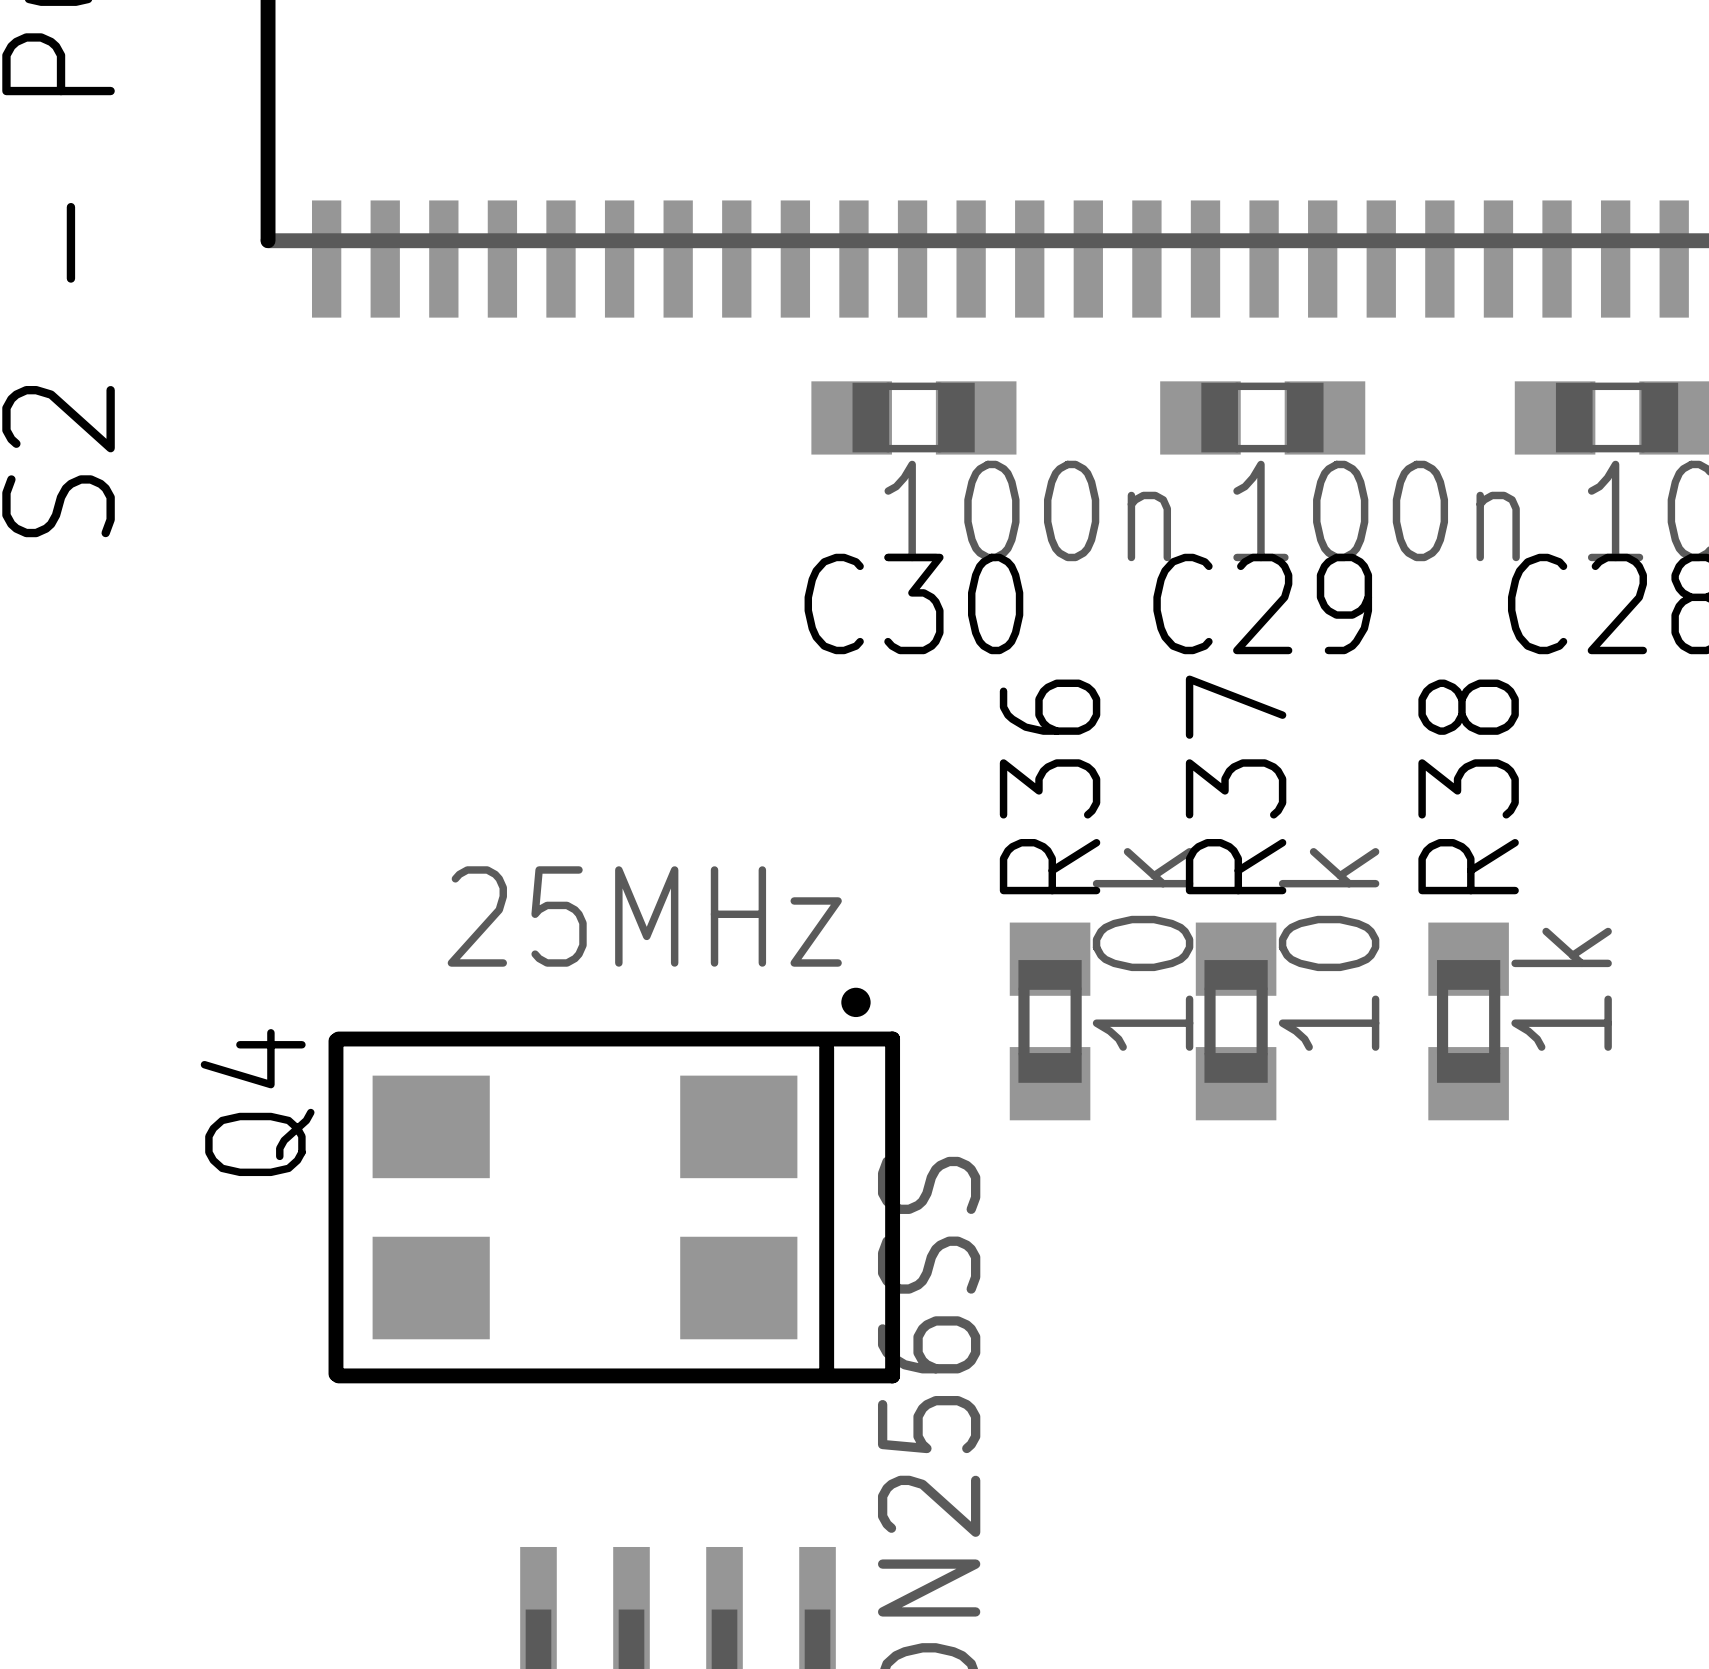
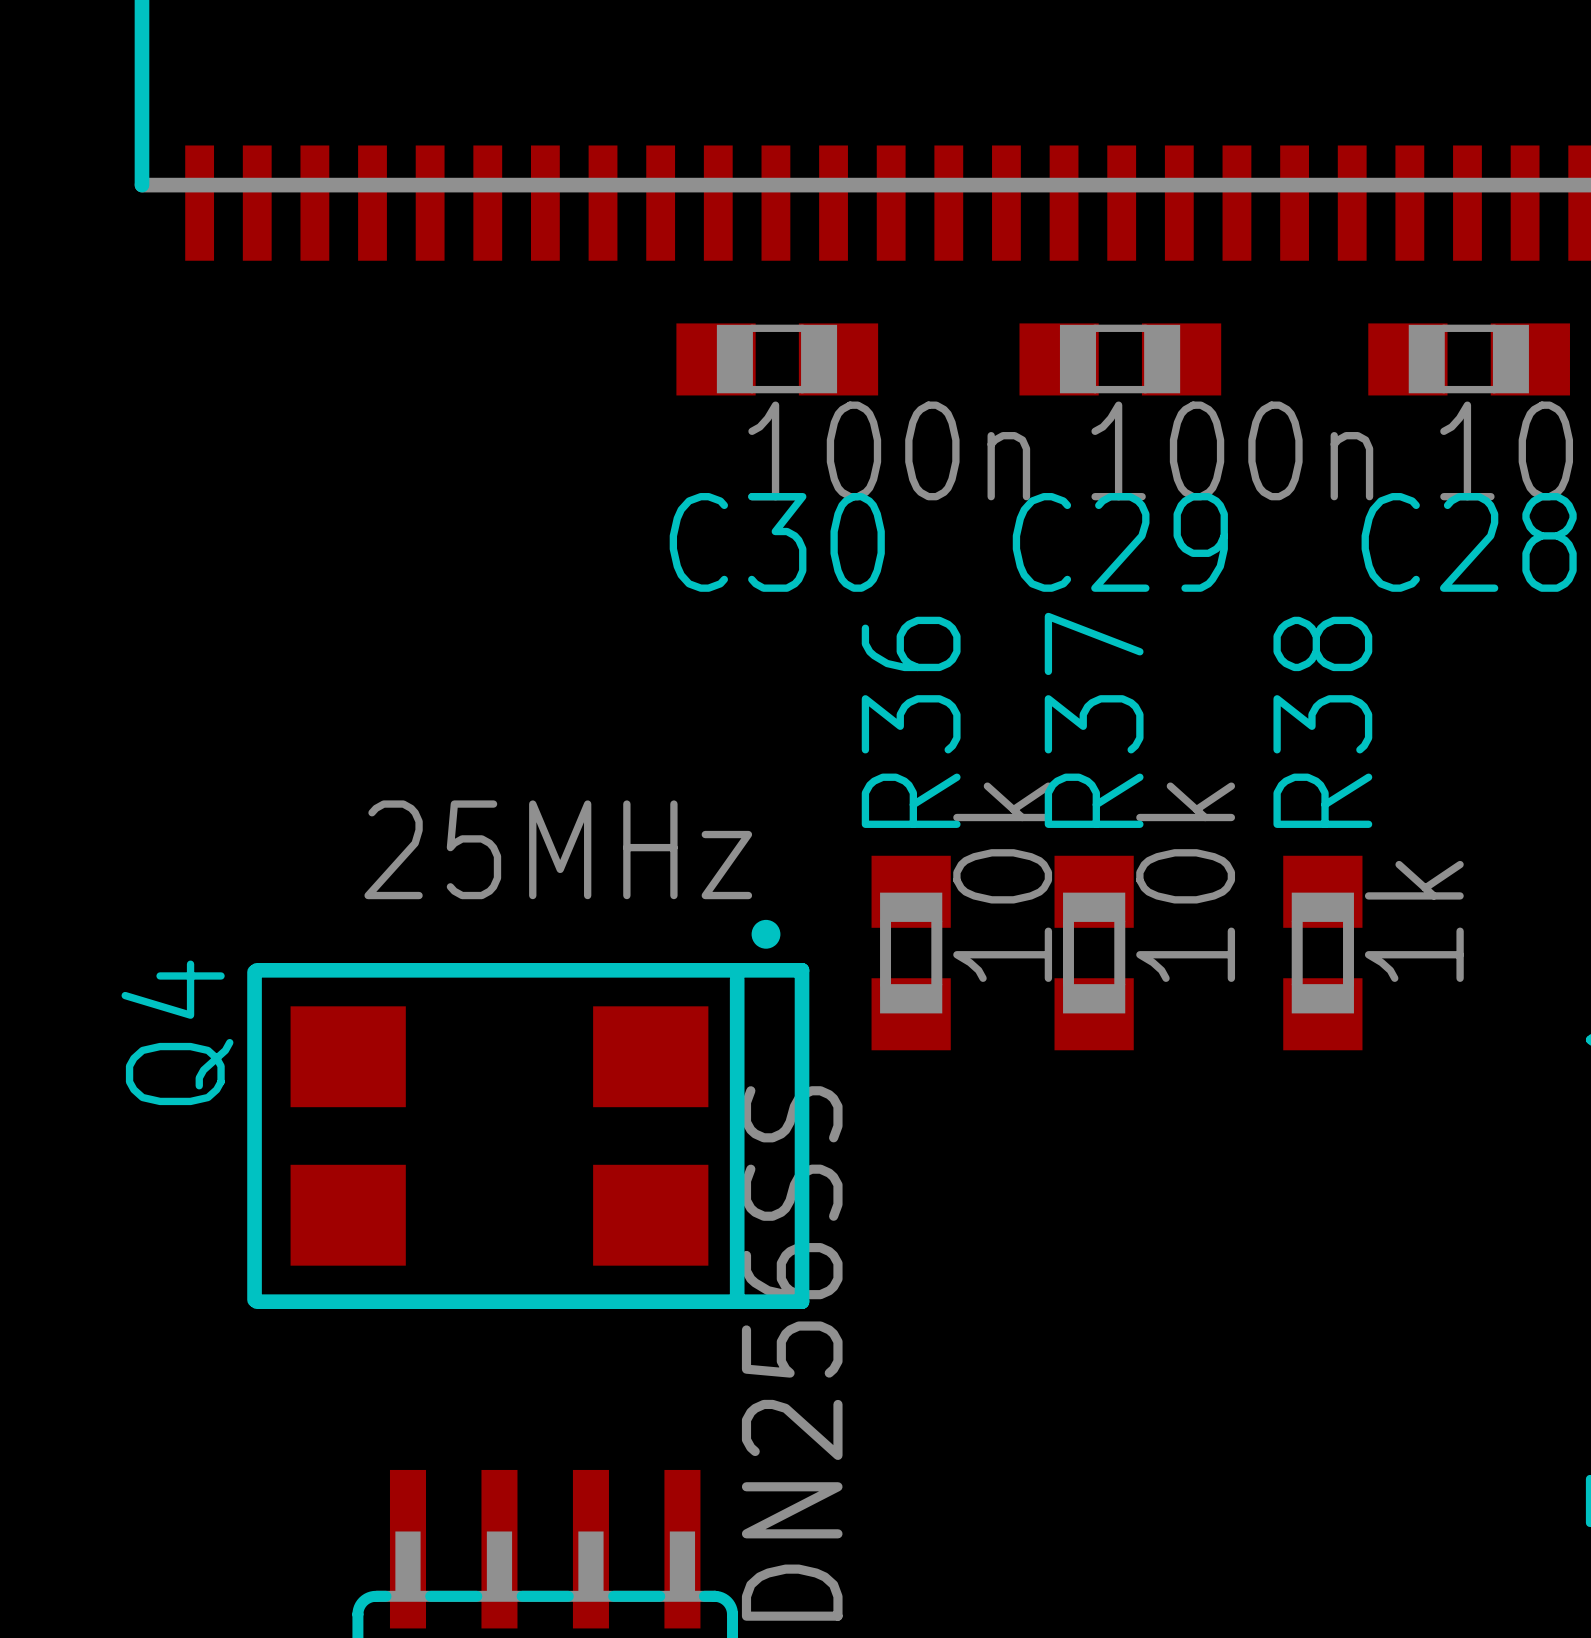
Q4 position: (614, 1185) -> (528, 1114)

